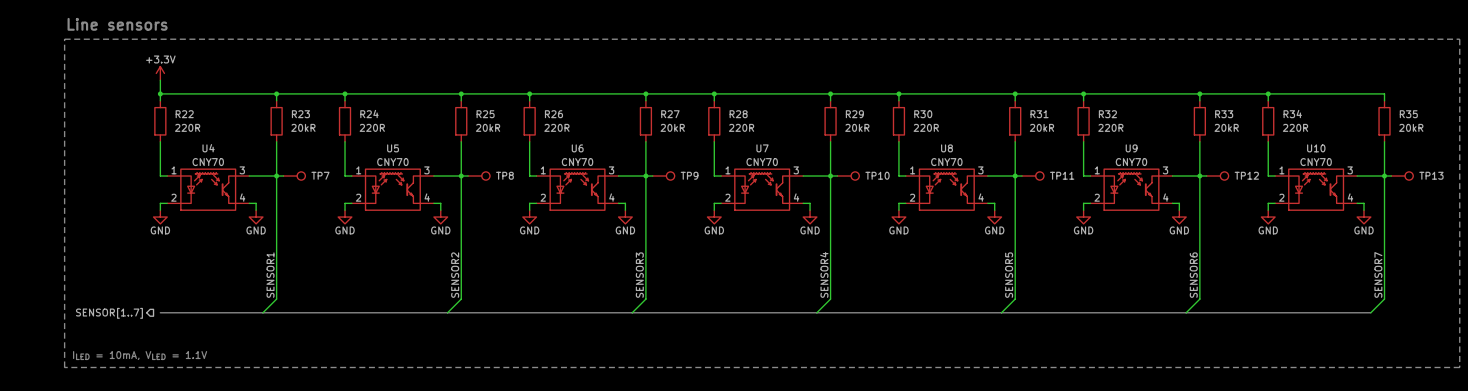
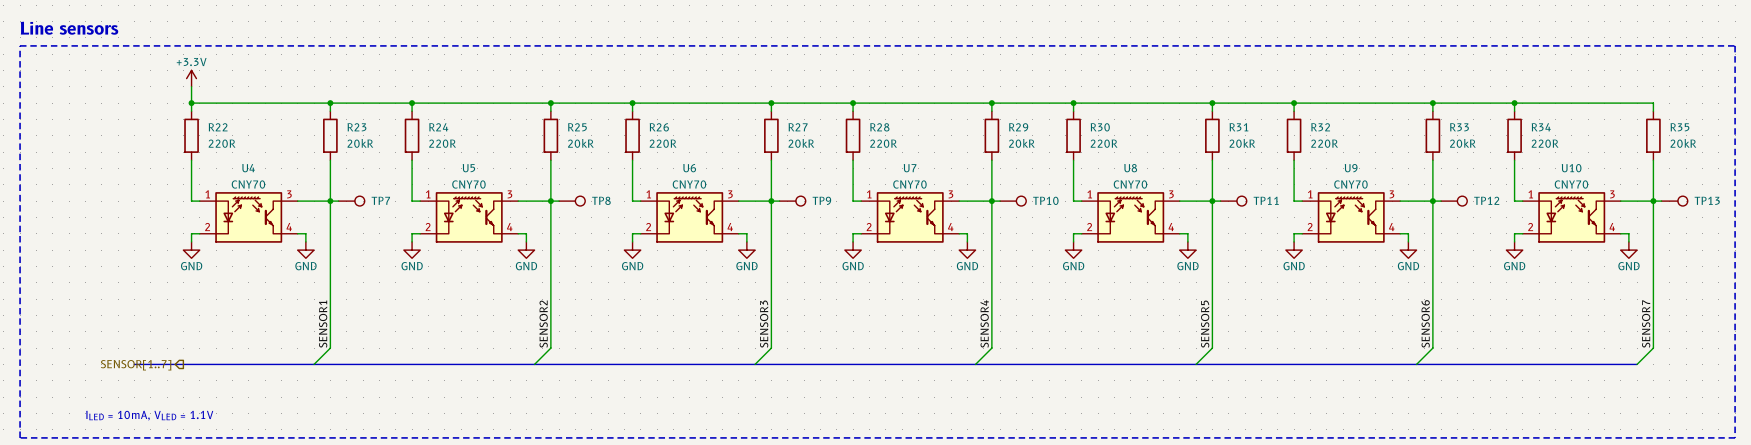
text position: Line sensors (117, 24) -> Line sensors (69, 28)
line: (64, 39) (1459, 39) (1459, 367) (64, 367) (64, 39) -> (20, 45) (20, 437) (1735, 437) (1735, 45) (20, 45)
bus: none -> (134, 364) (191, 364)

